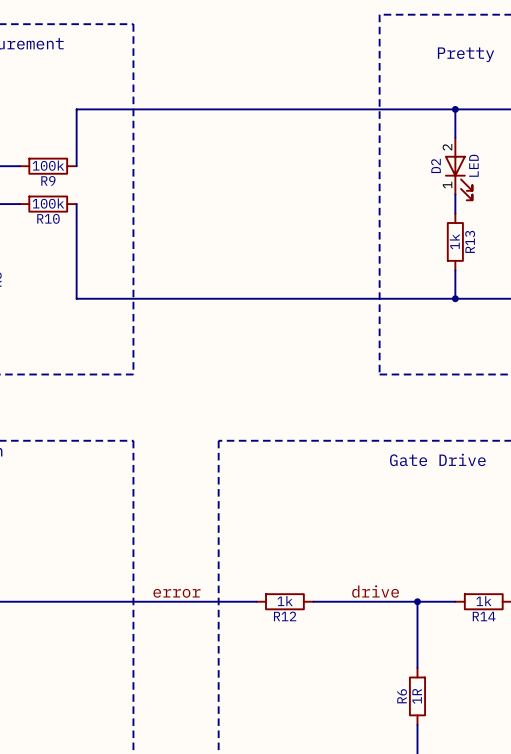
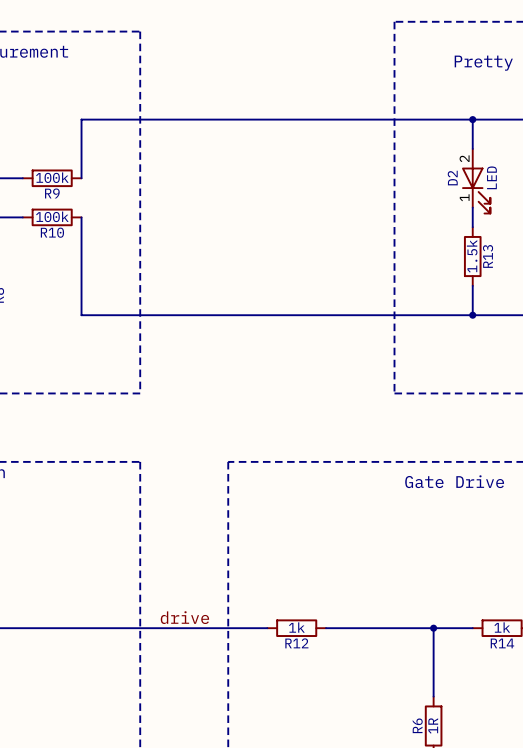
R13 value: 1k (454, 241) -> 1.5k (472, 256)
label: drive (375, 591) -> none
label: error (177, 593) -> drive (184, 617)

